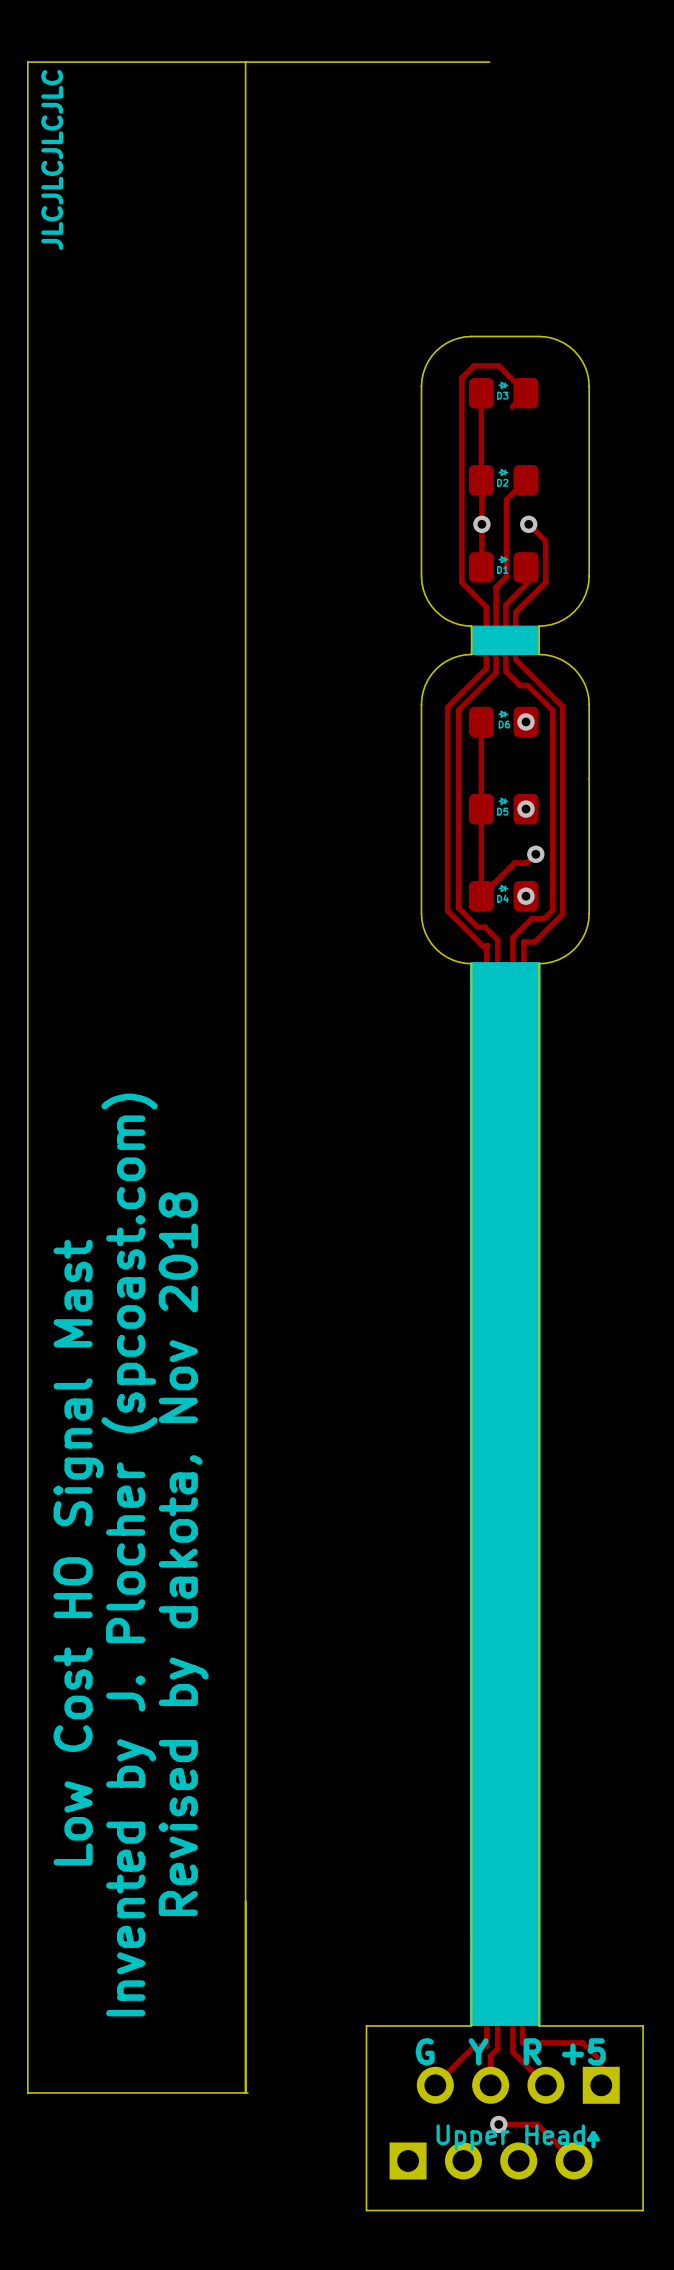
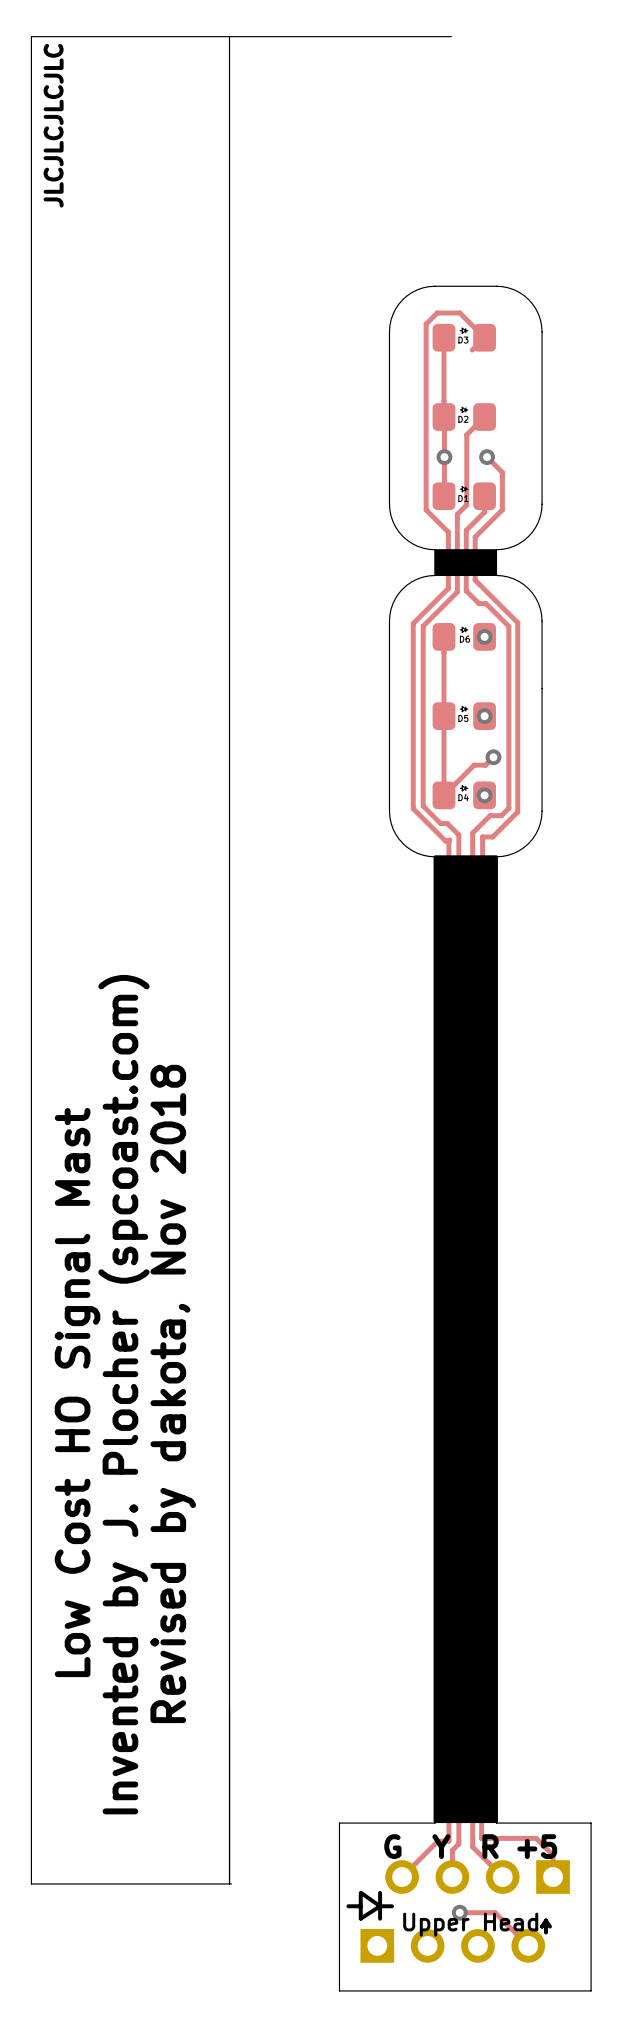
line: none -> (360, 1892) (360, 1918) (380, 1906) (361, 1893)
line: none -> (380, 1892) (380, 1918)
line: none -> (348, 1906) (360, 1906)
line: none -> (379, 1906) (391, 1906)

